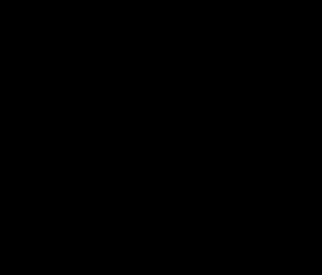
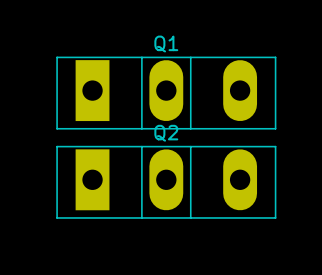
Q1: none -> (166, 93)
Q2: none -> (166, 182)

